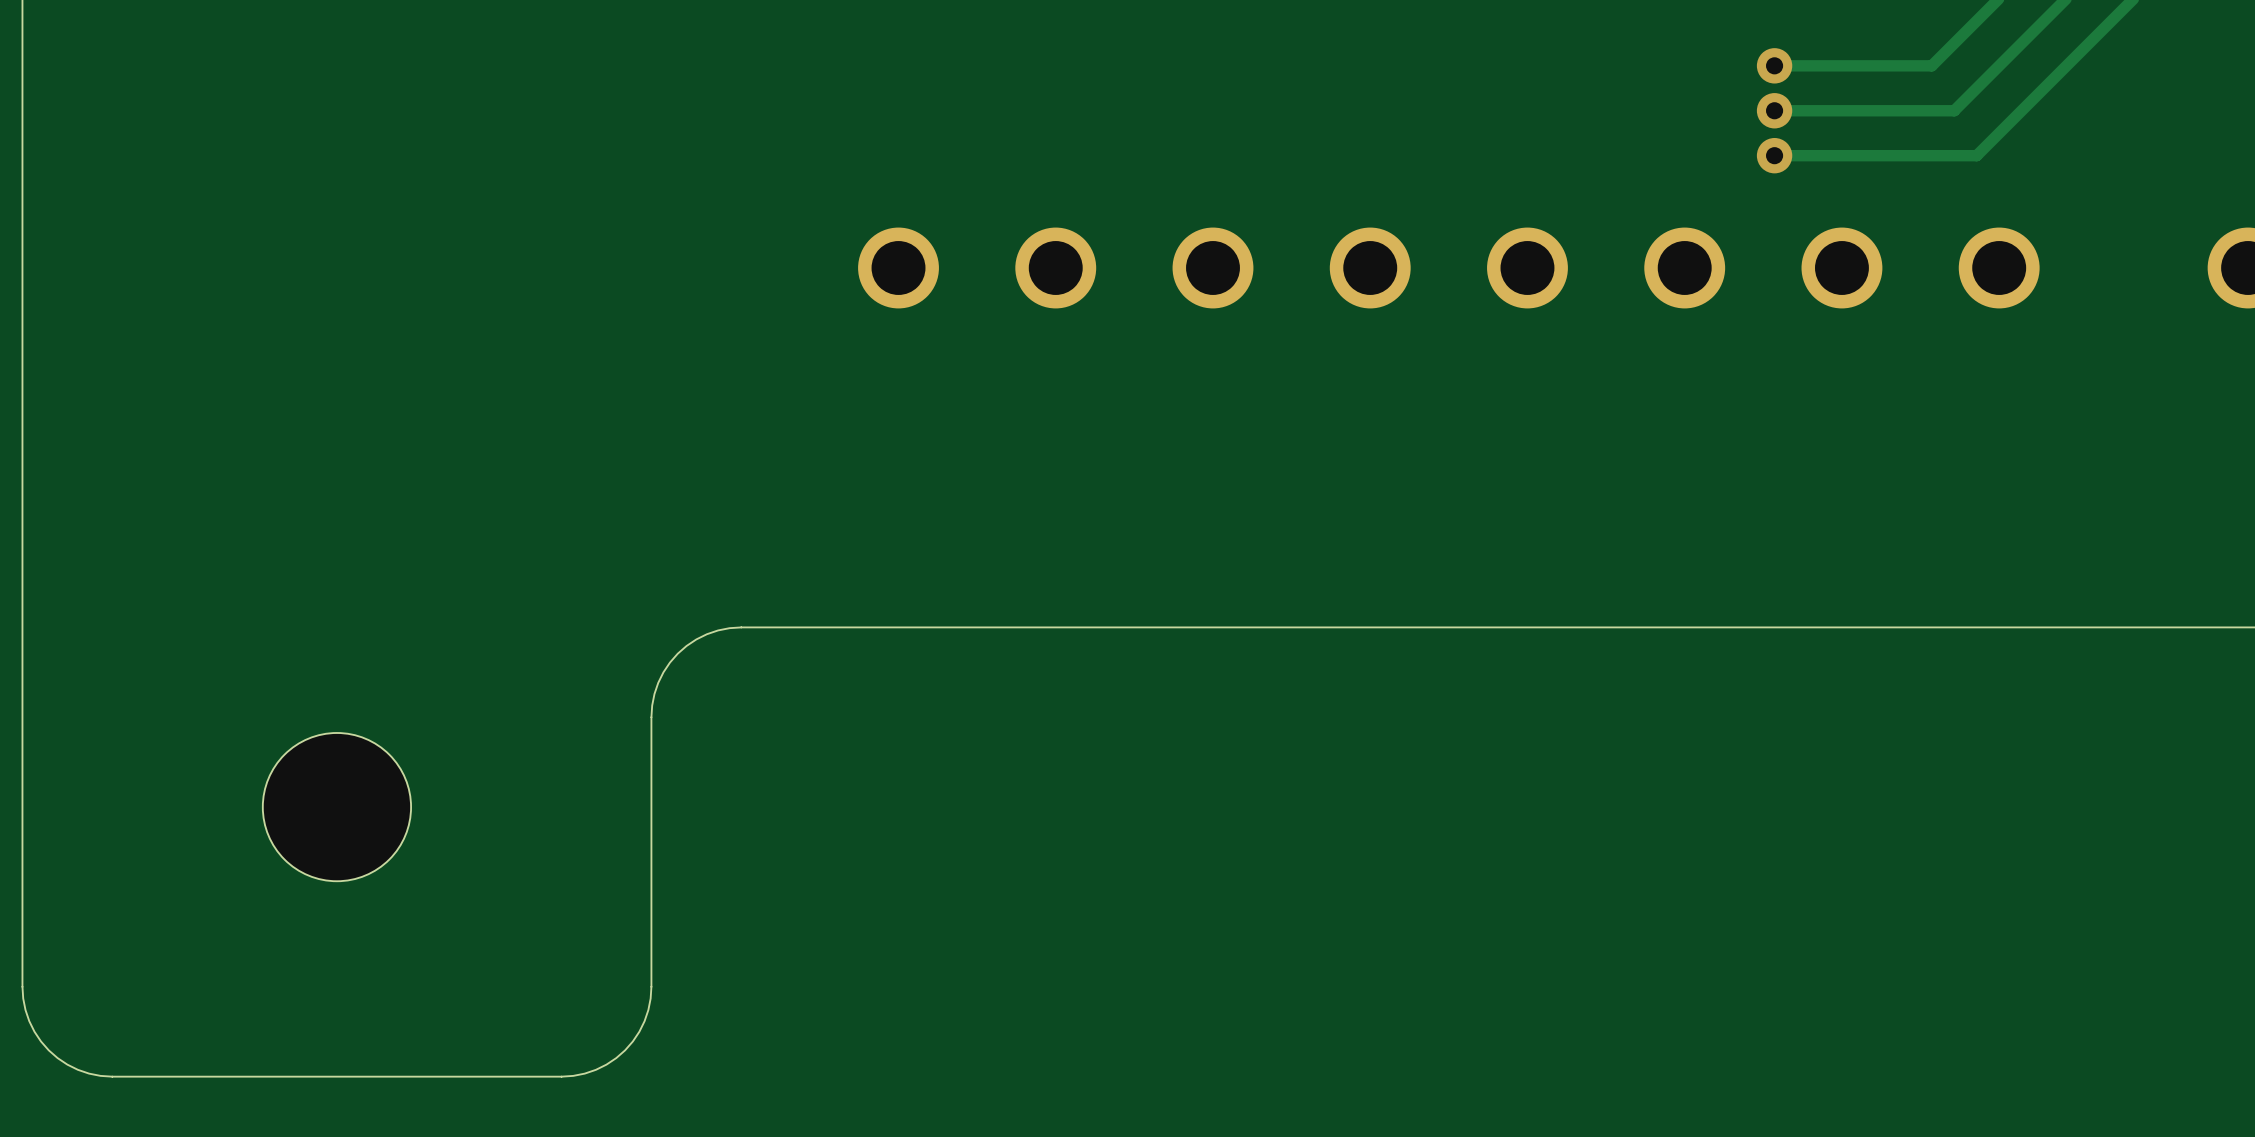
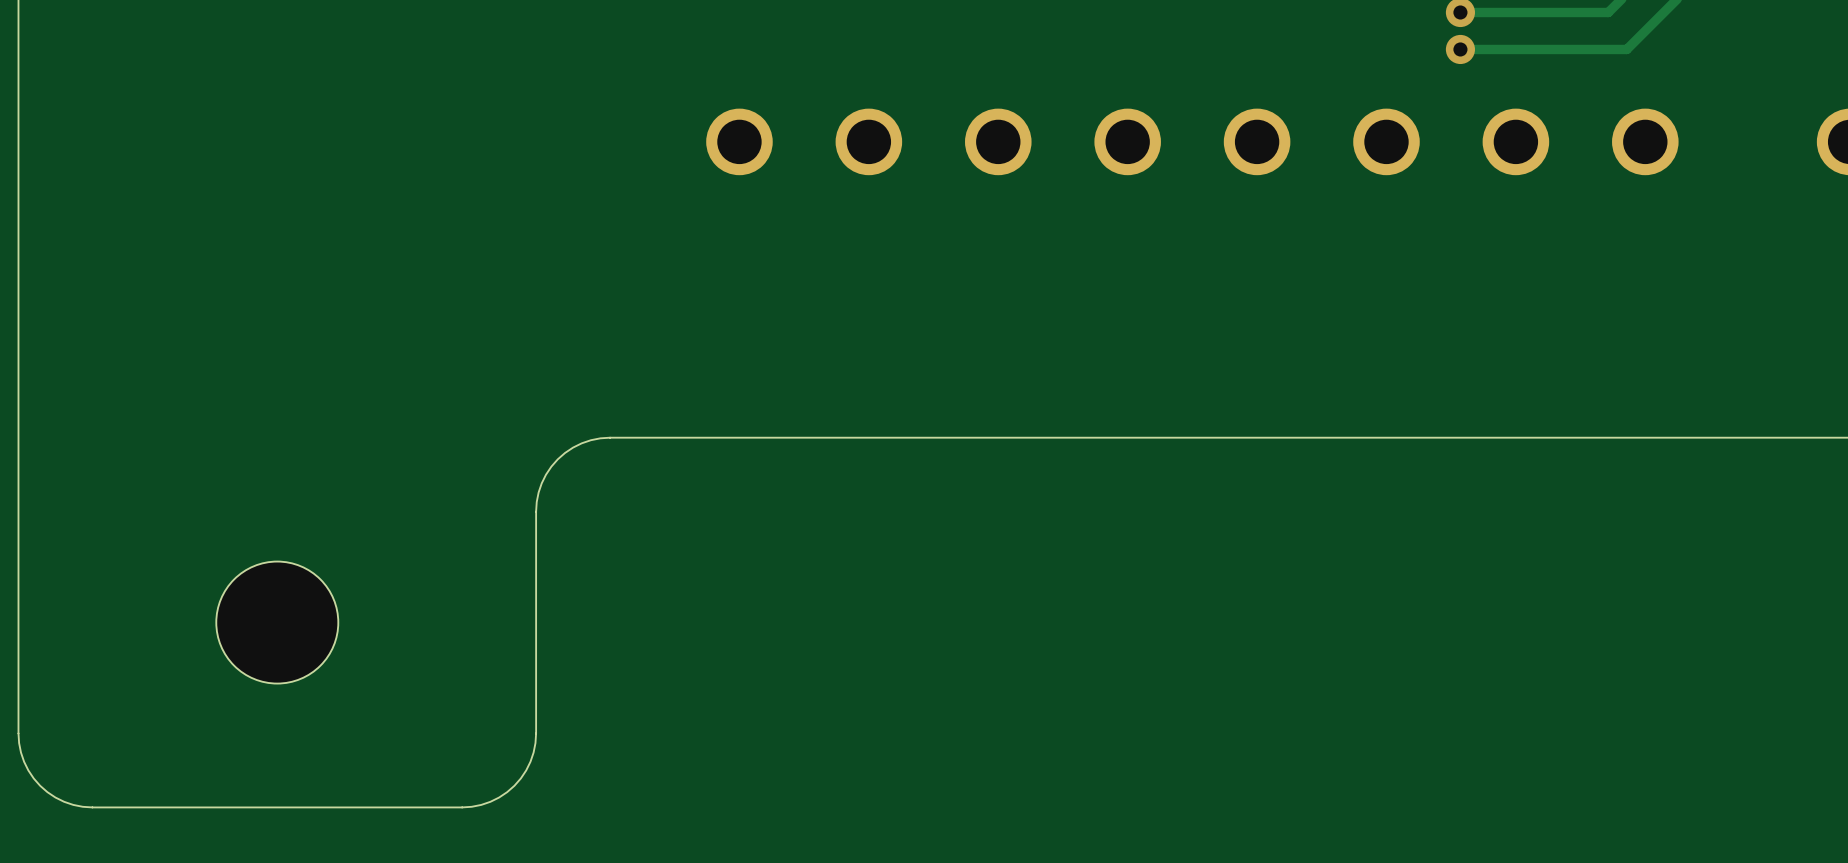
hole position: (336, 807) -> (277, 622)

